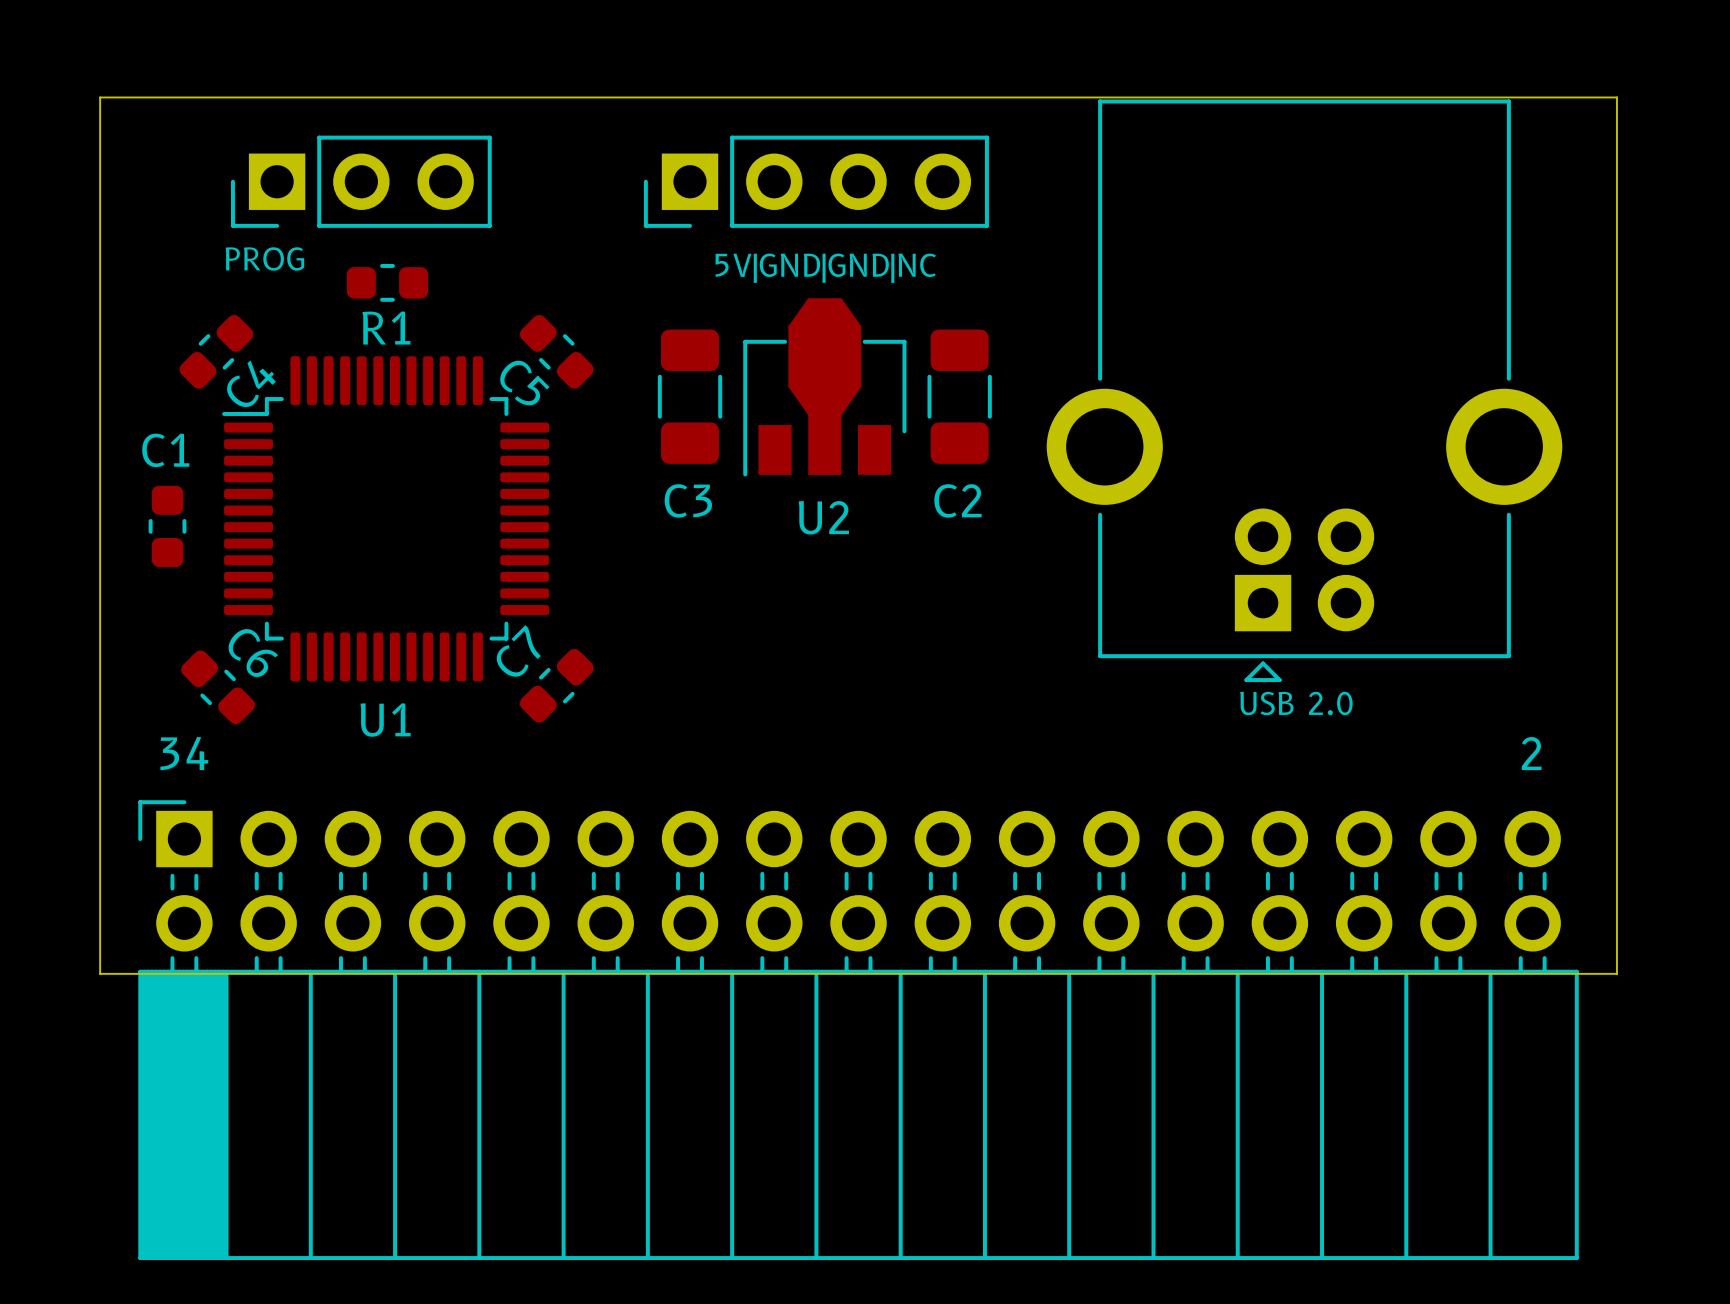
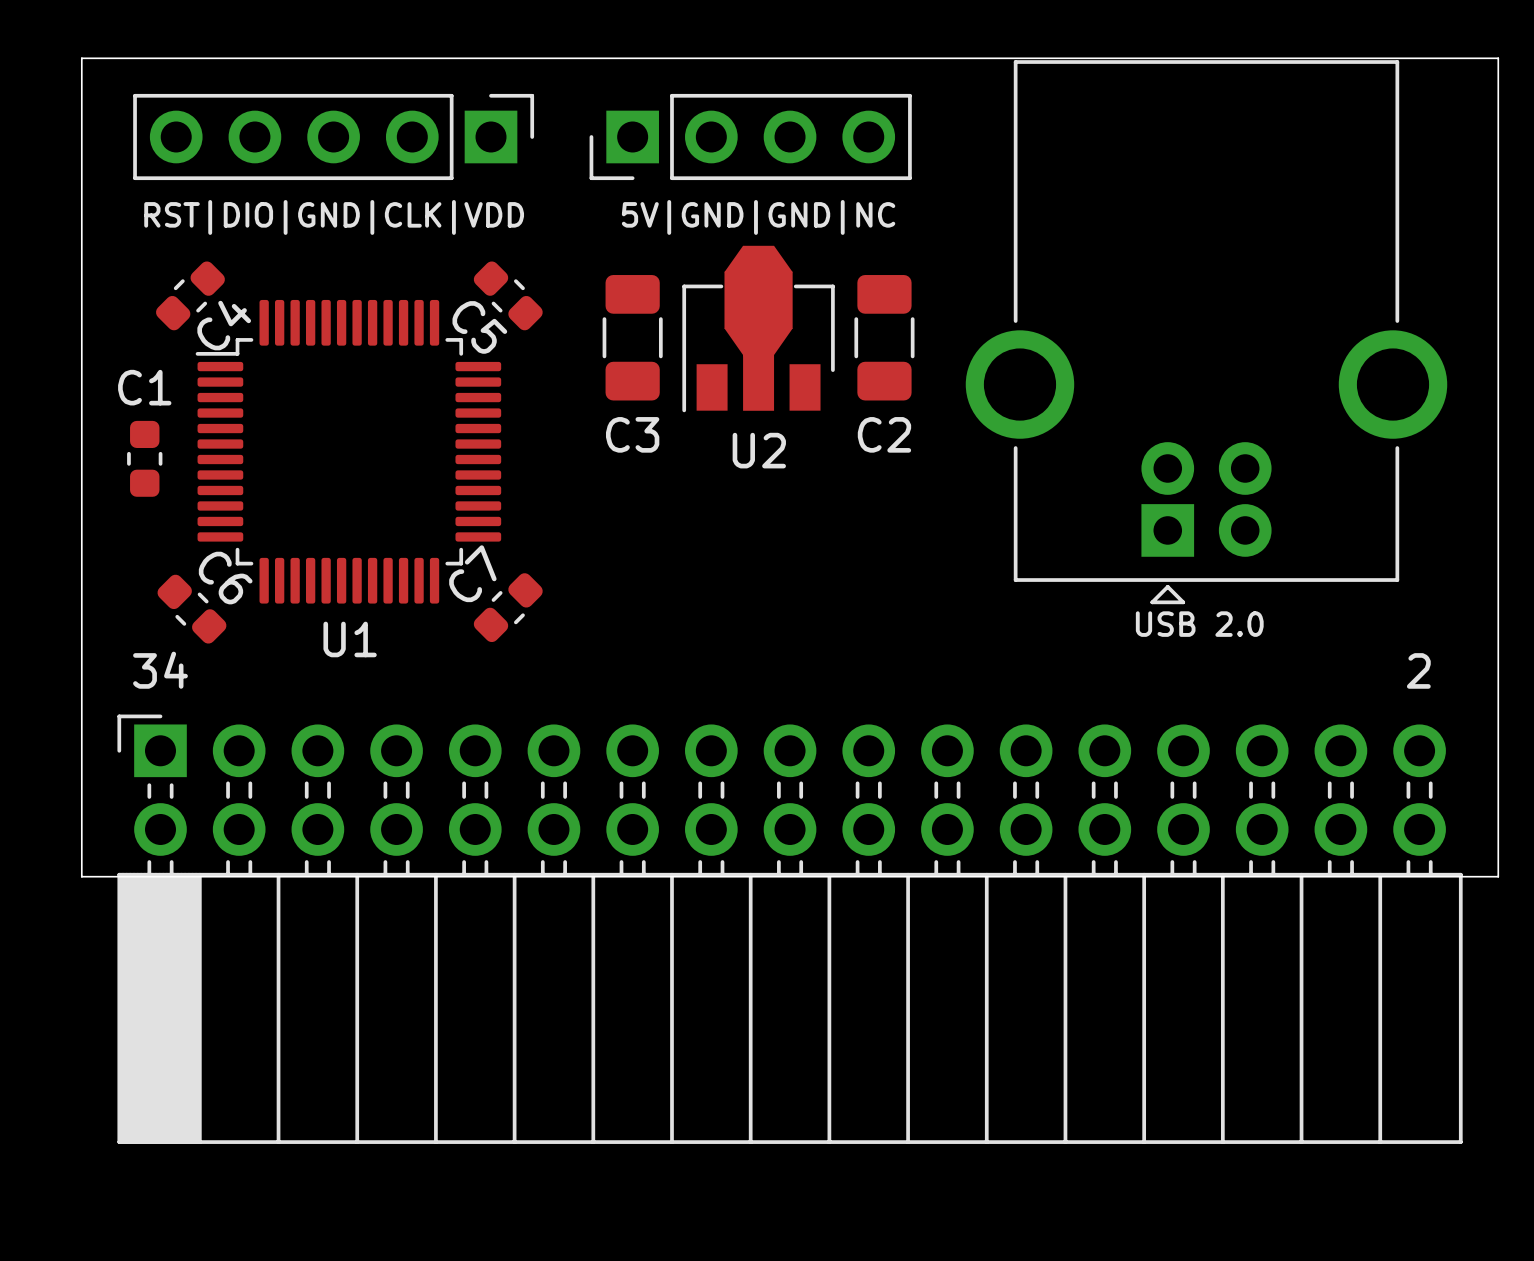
part footprint: [230, 135, 492, 228] -> [133, 93, 535, 181]
text: PROG (264, 258) -> none
text: none -> RST|DIO|GND|CLK|VDD (334, 217)
R1: (387, 282) -> none

